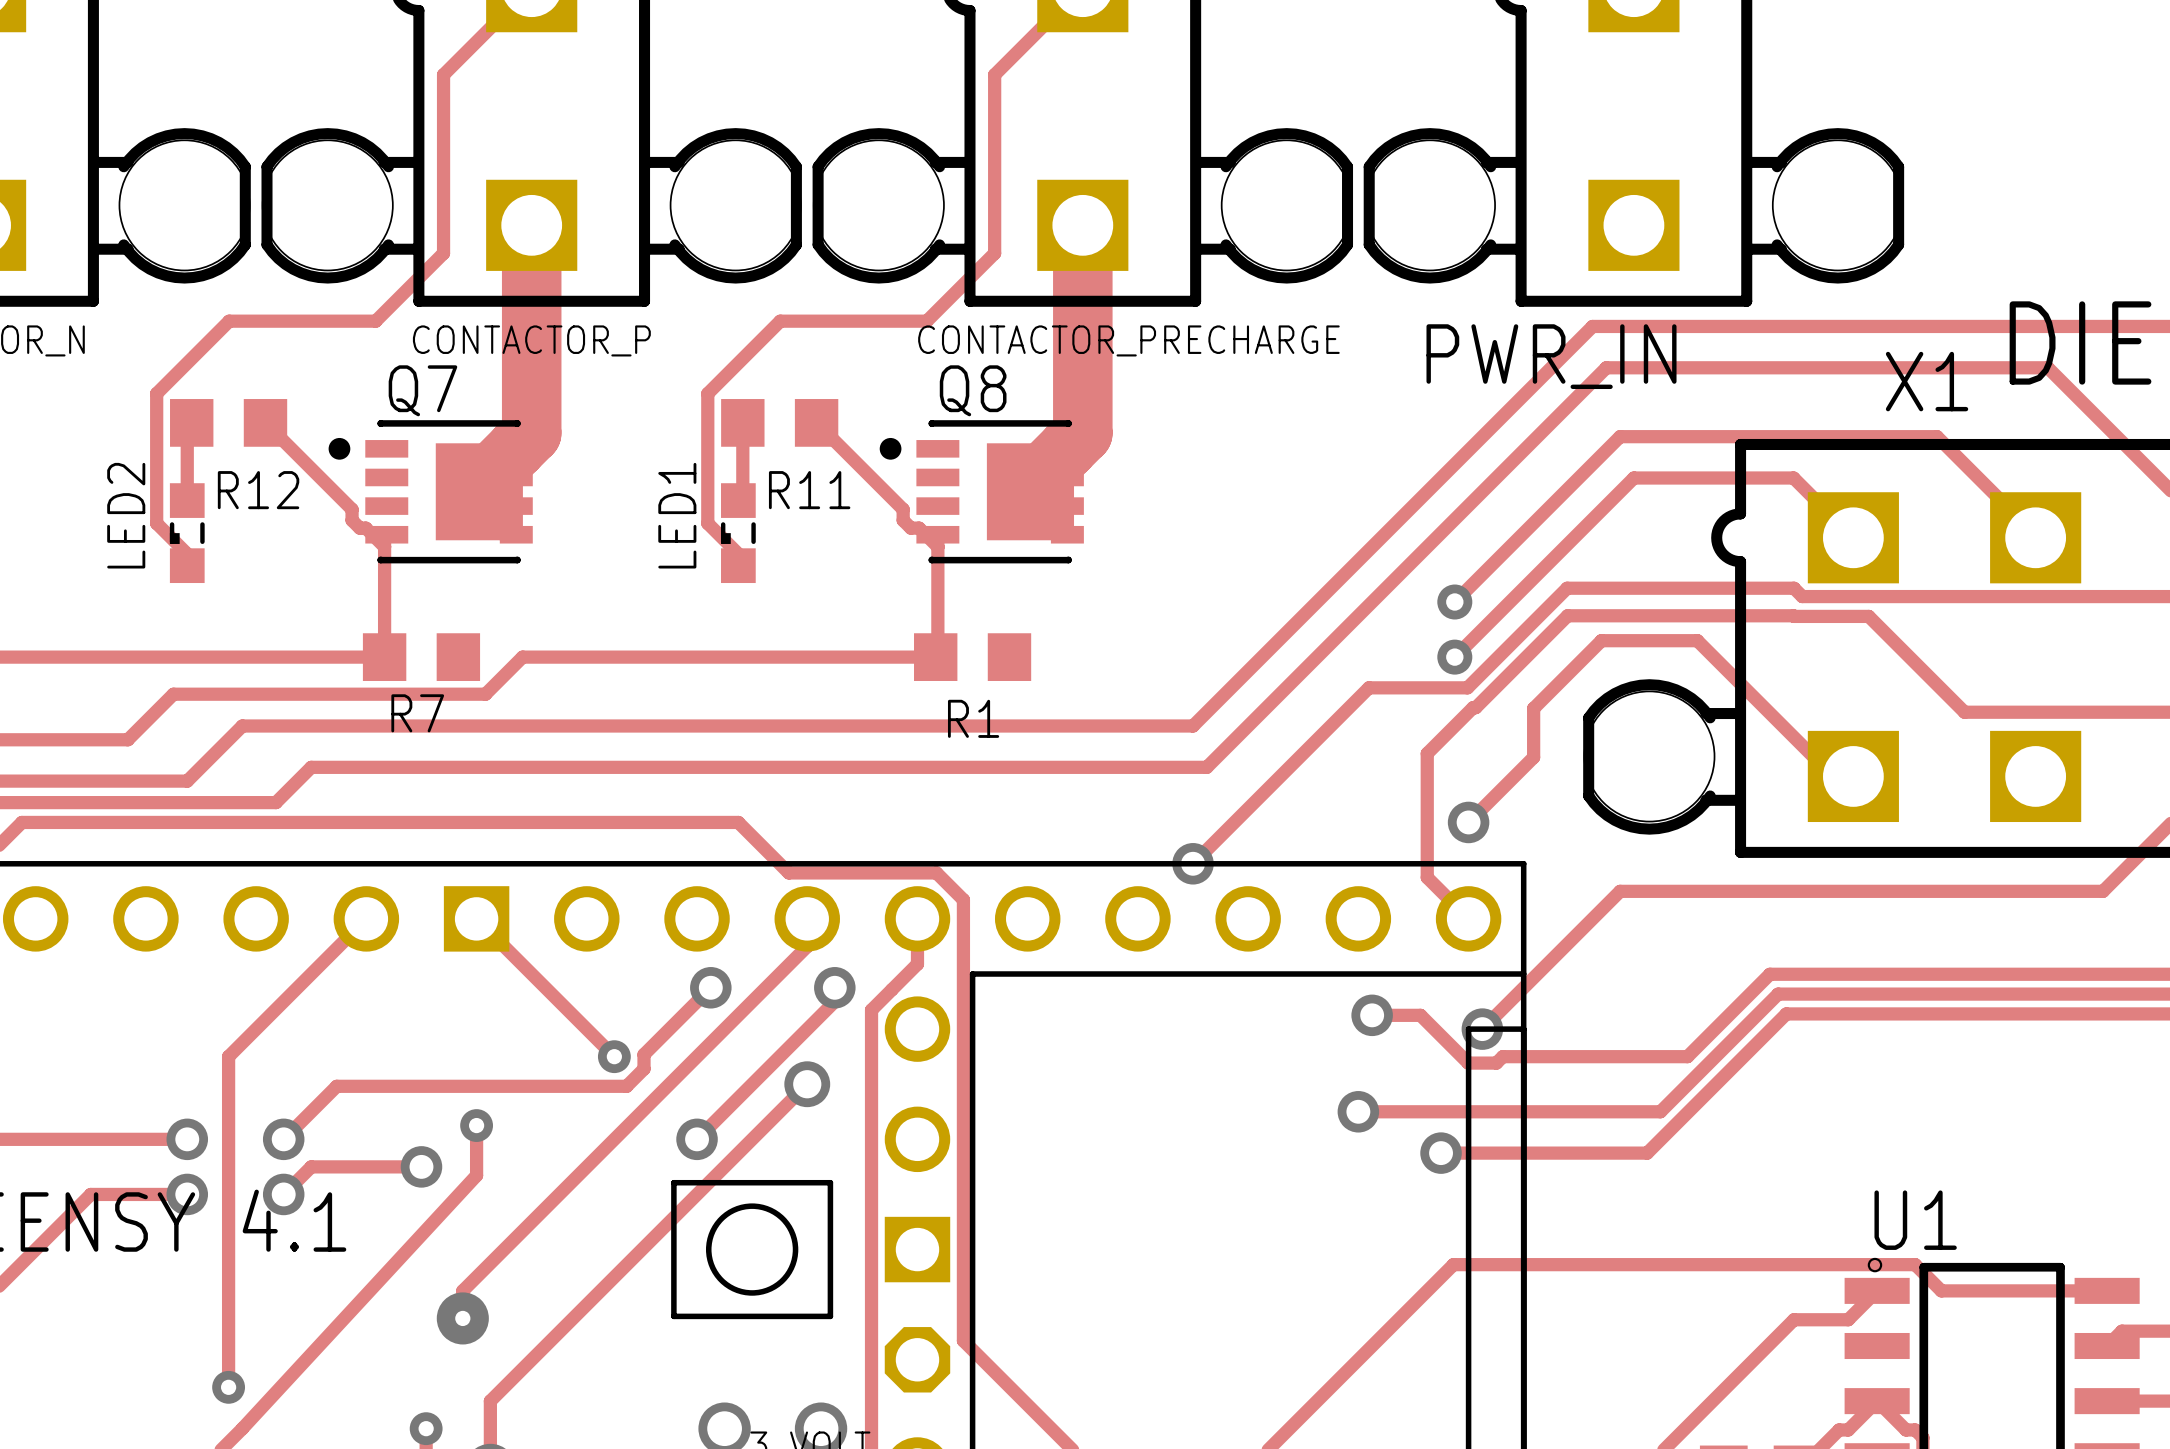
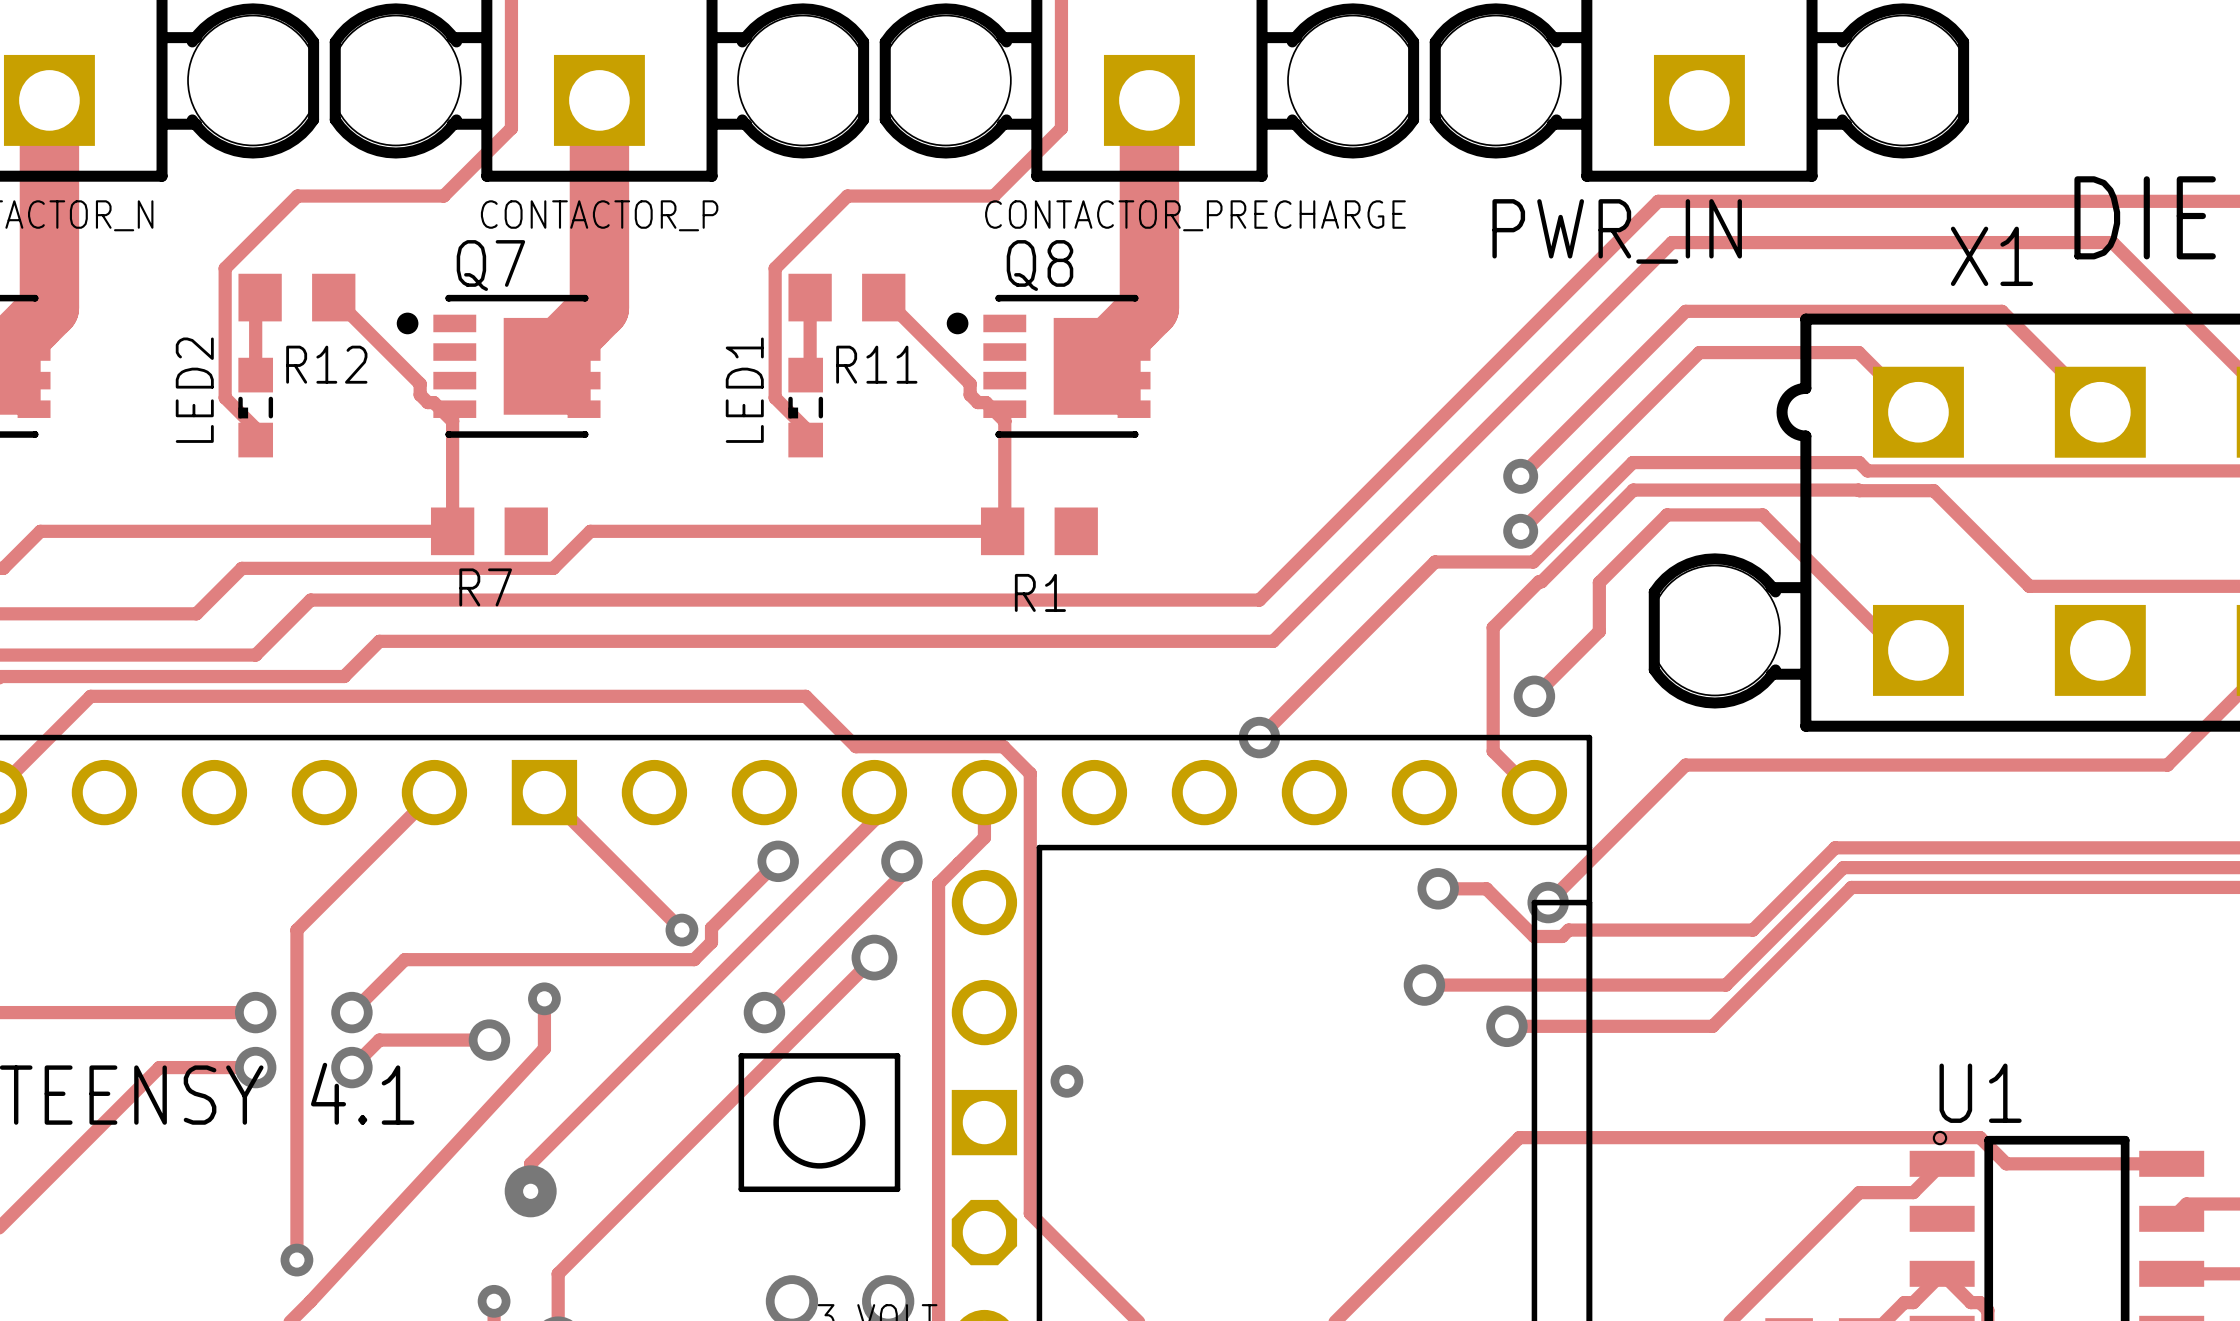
via: none -> (1066, 1081)

